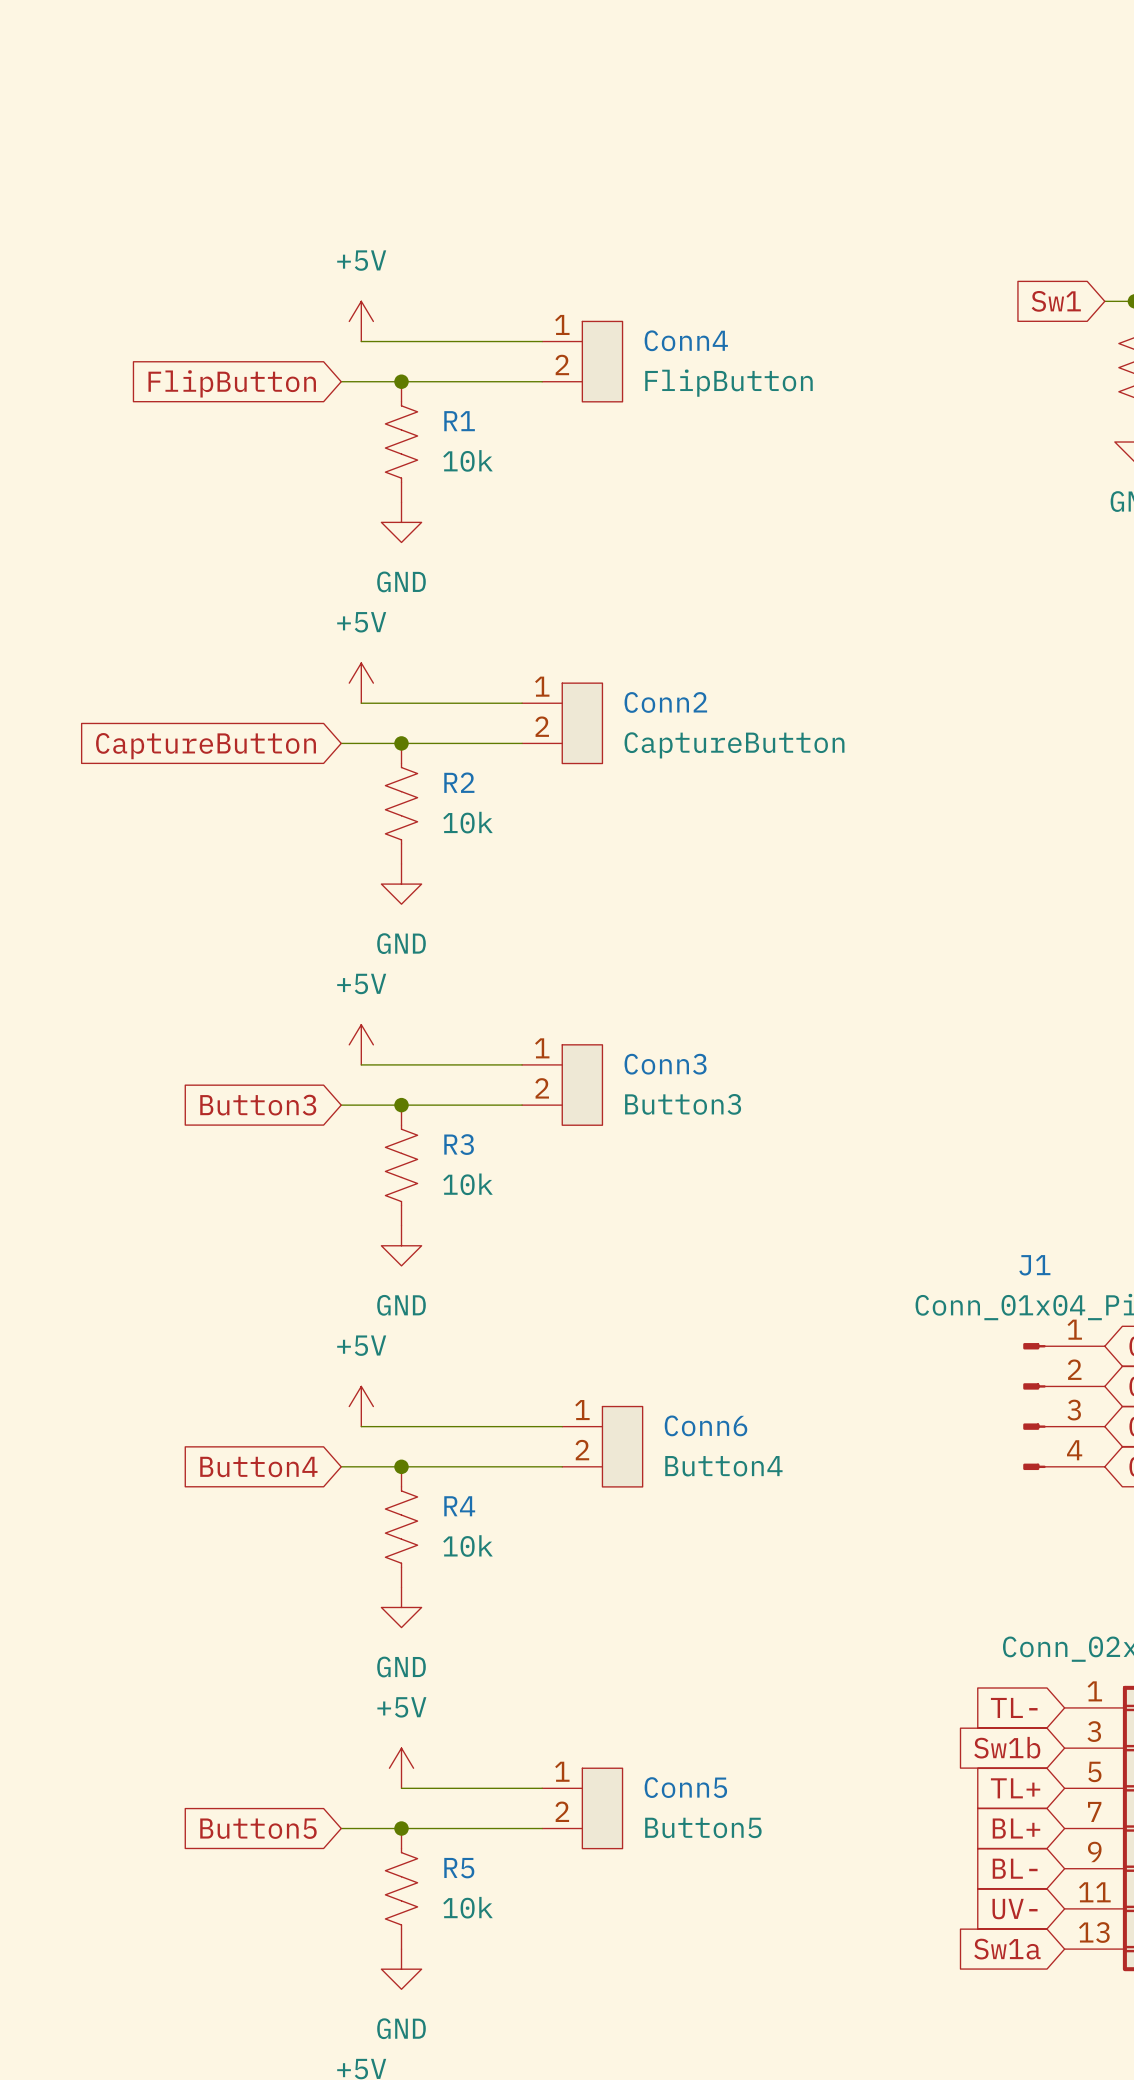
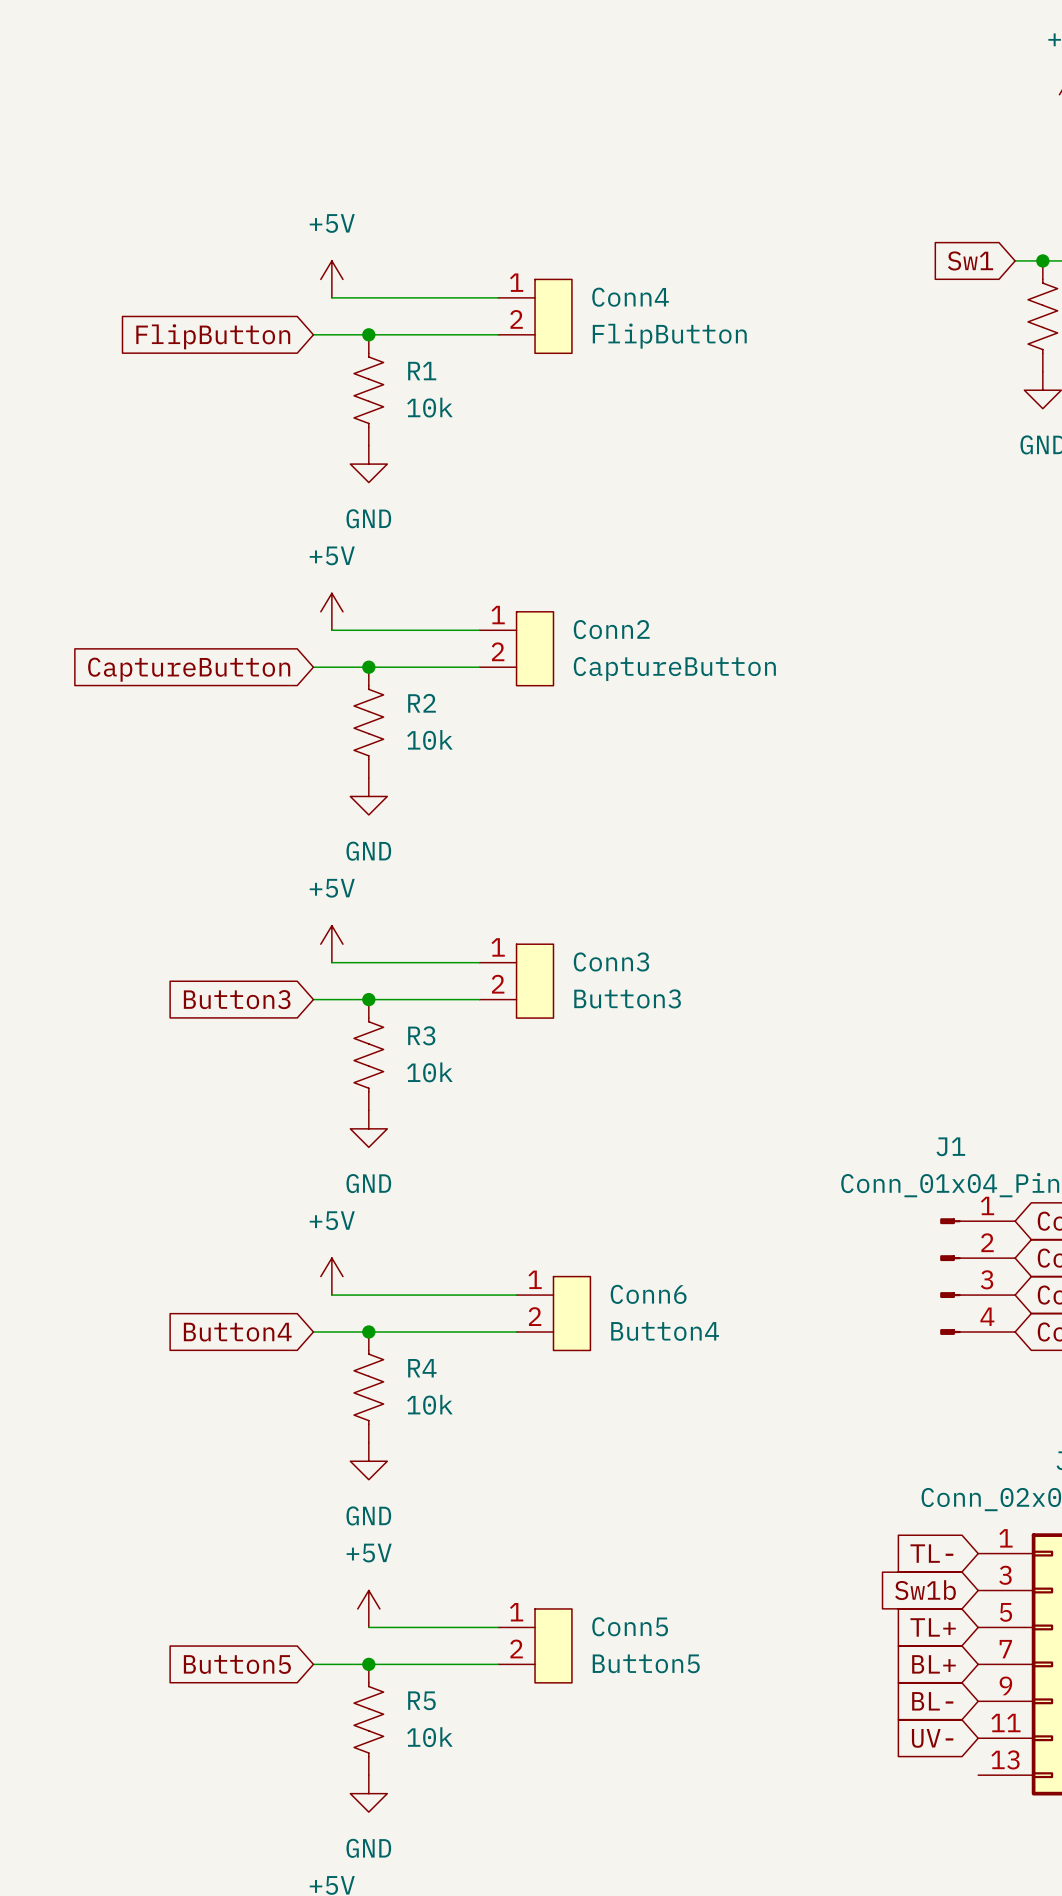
global label: Sw1a (1007, 1949) -> none

